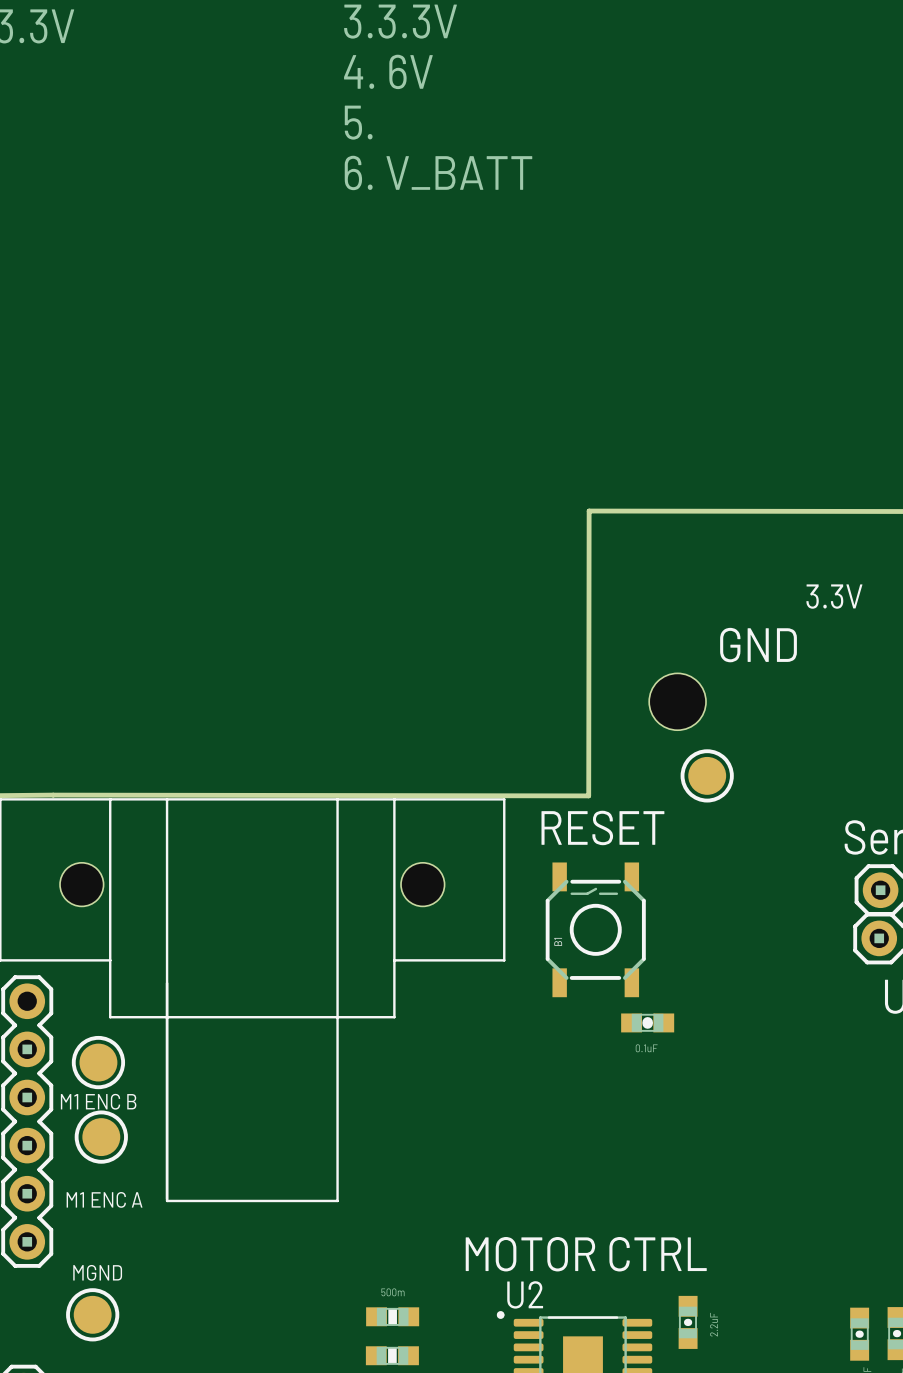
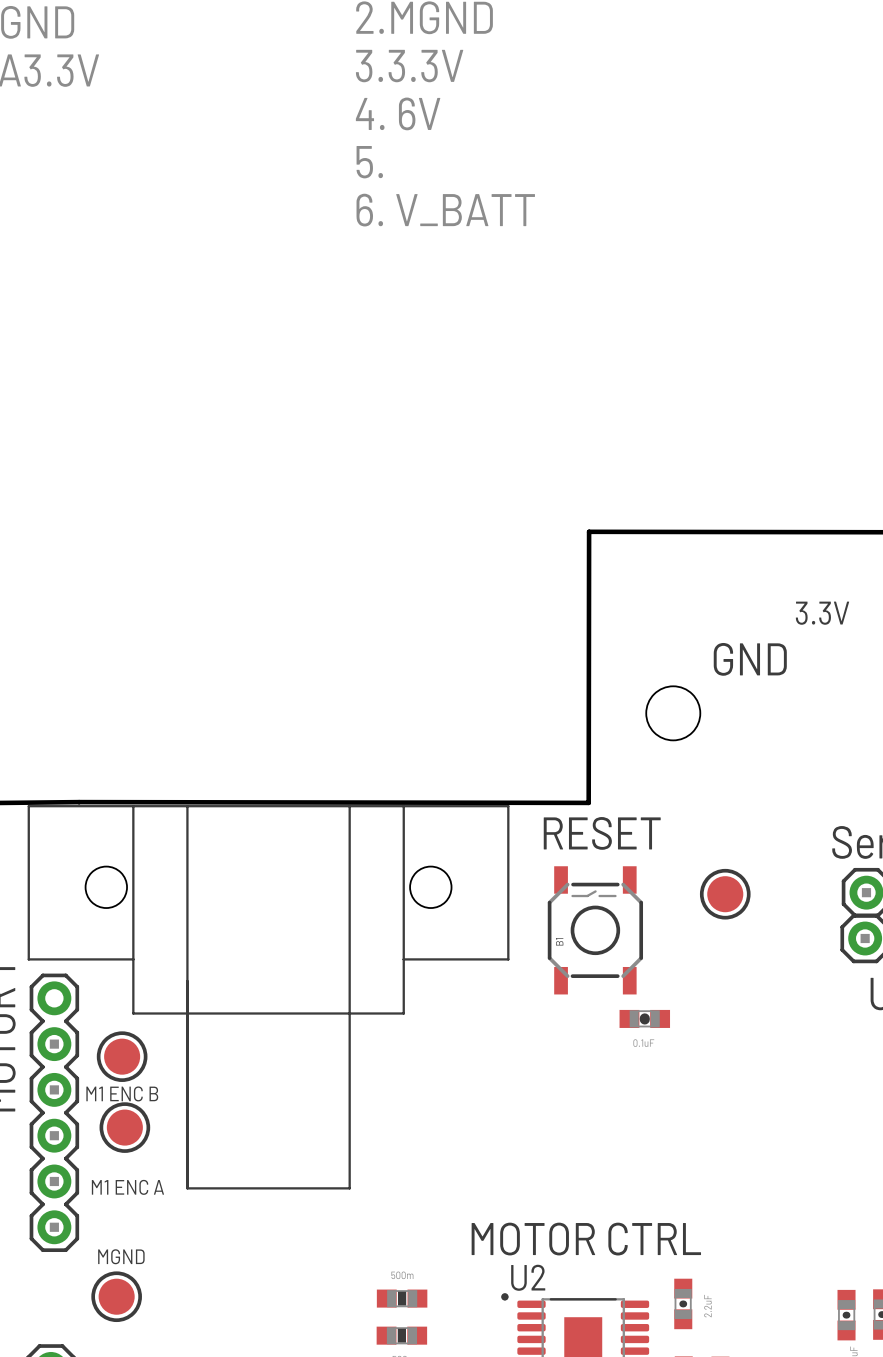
part position: (707, 775) -> (725, 894)

